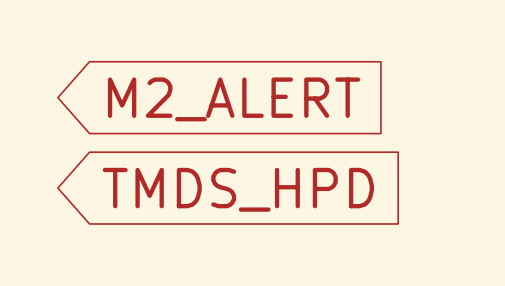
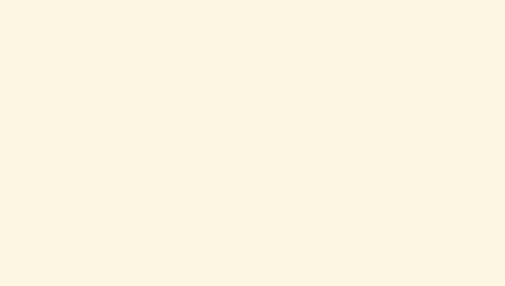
global label: M2_ALERT (234, 99) -> none
global label: TMDS_HPD (238, 189) -> none

